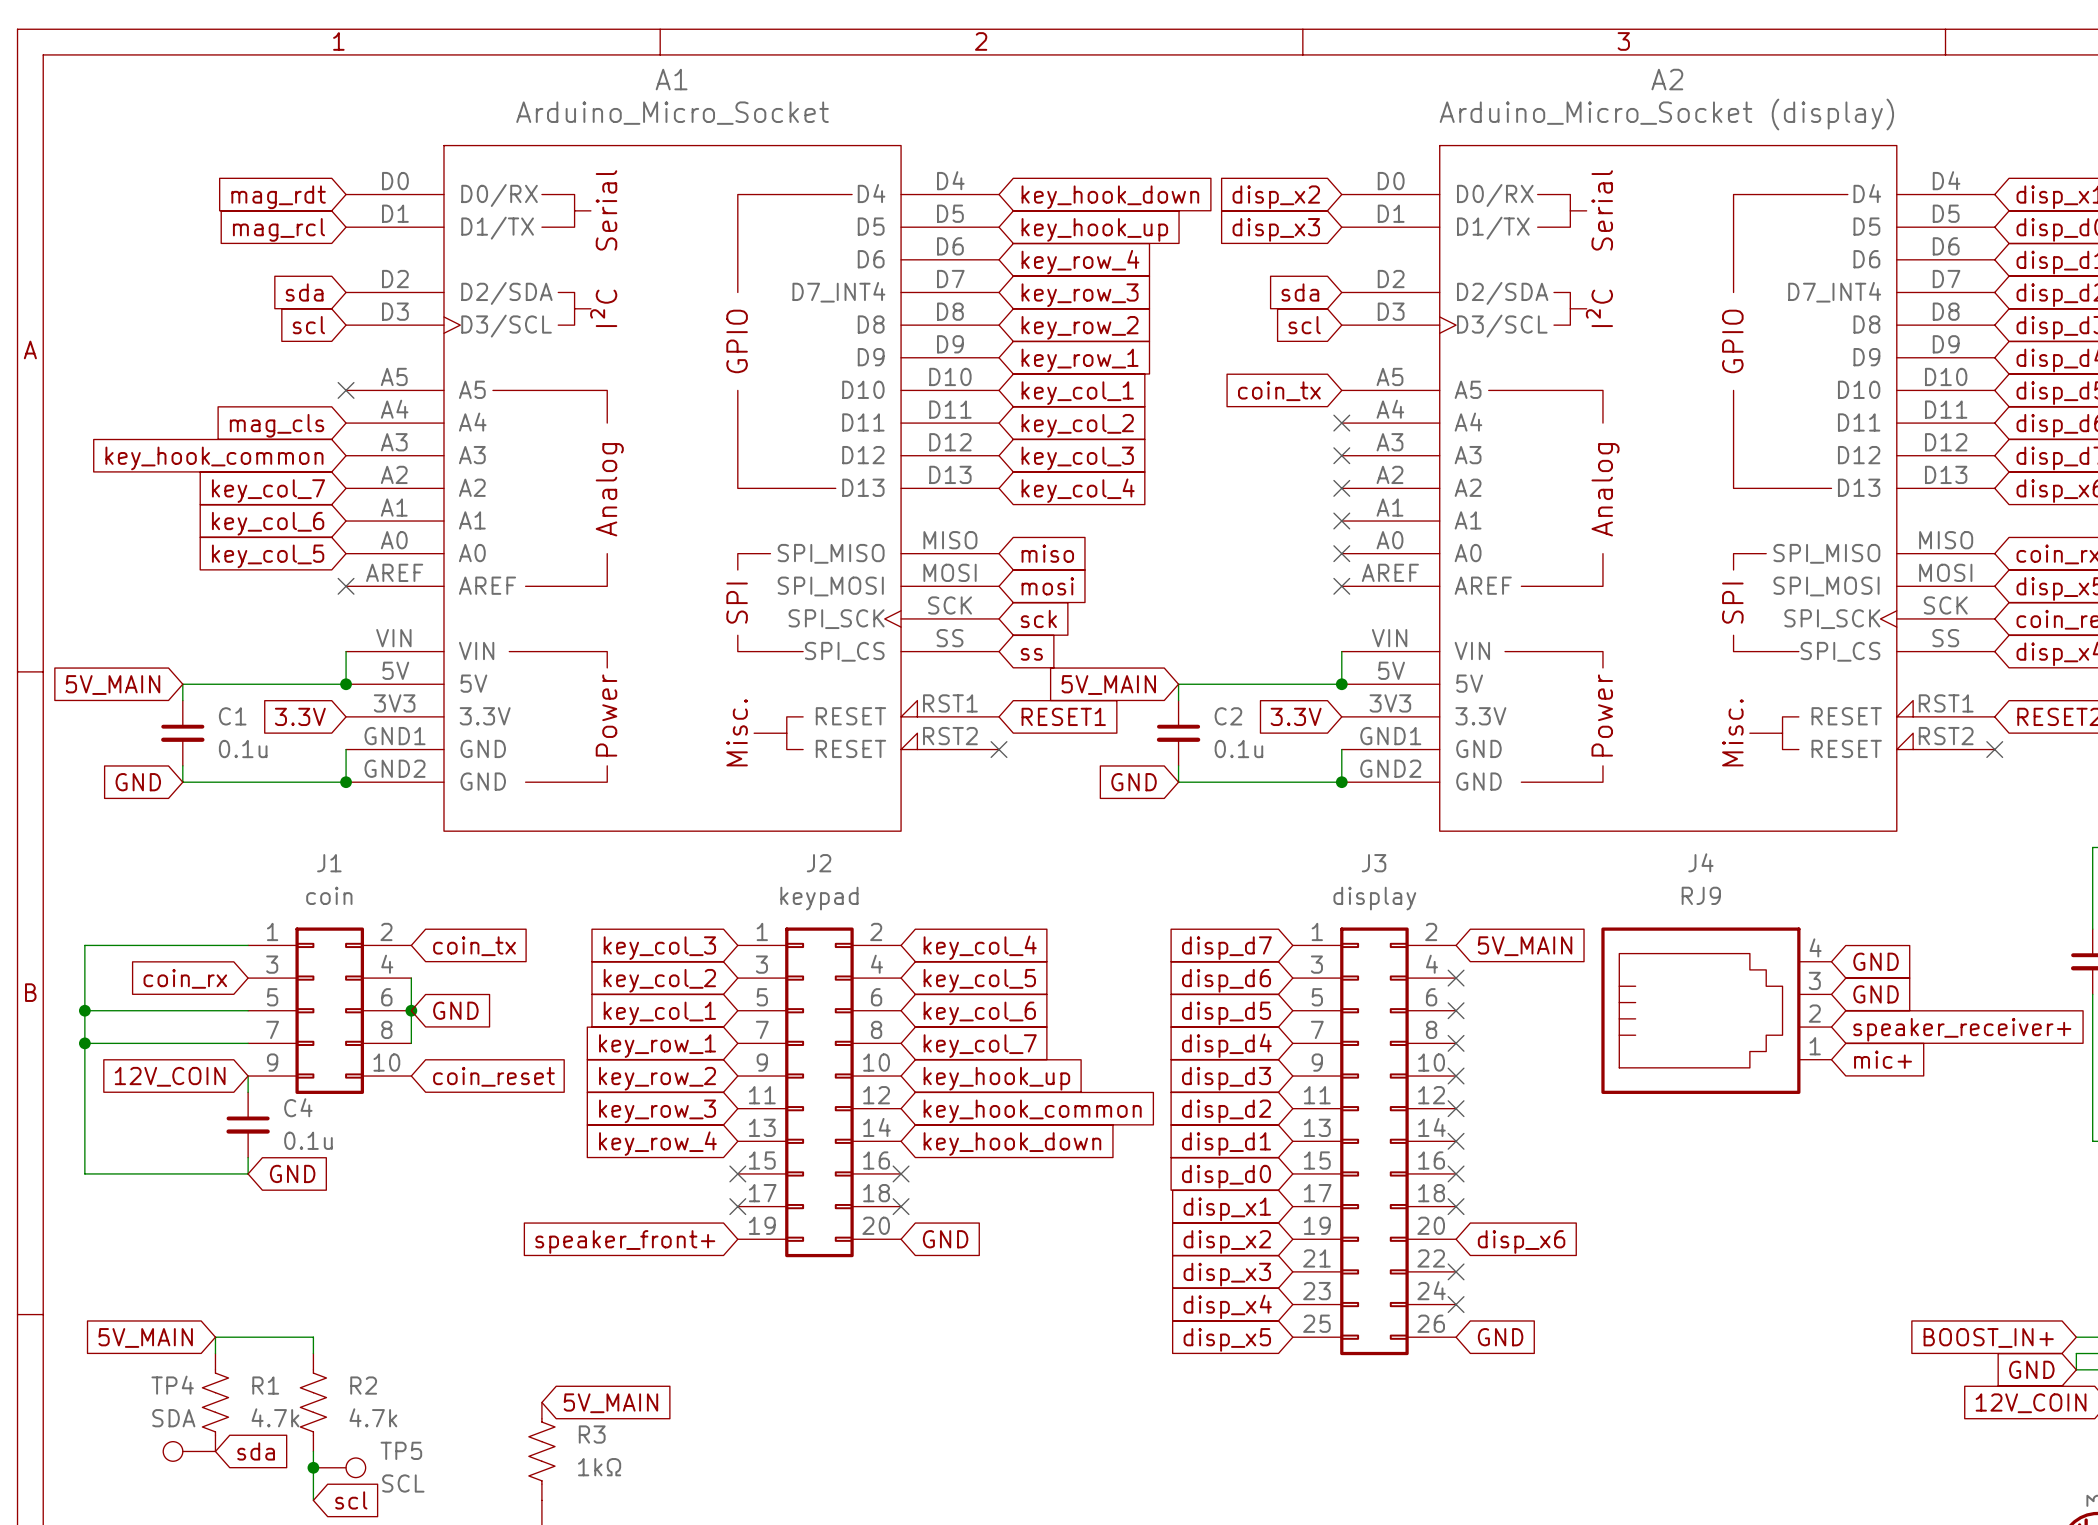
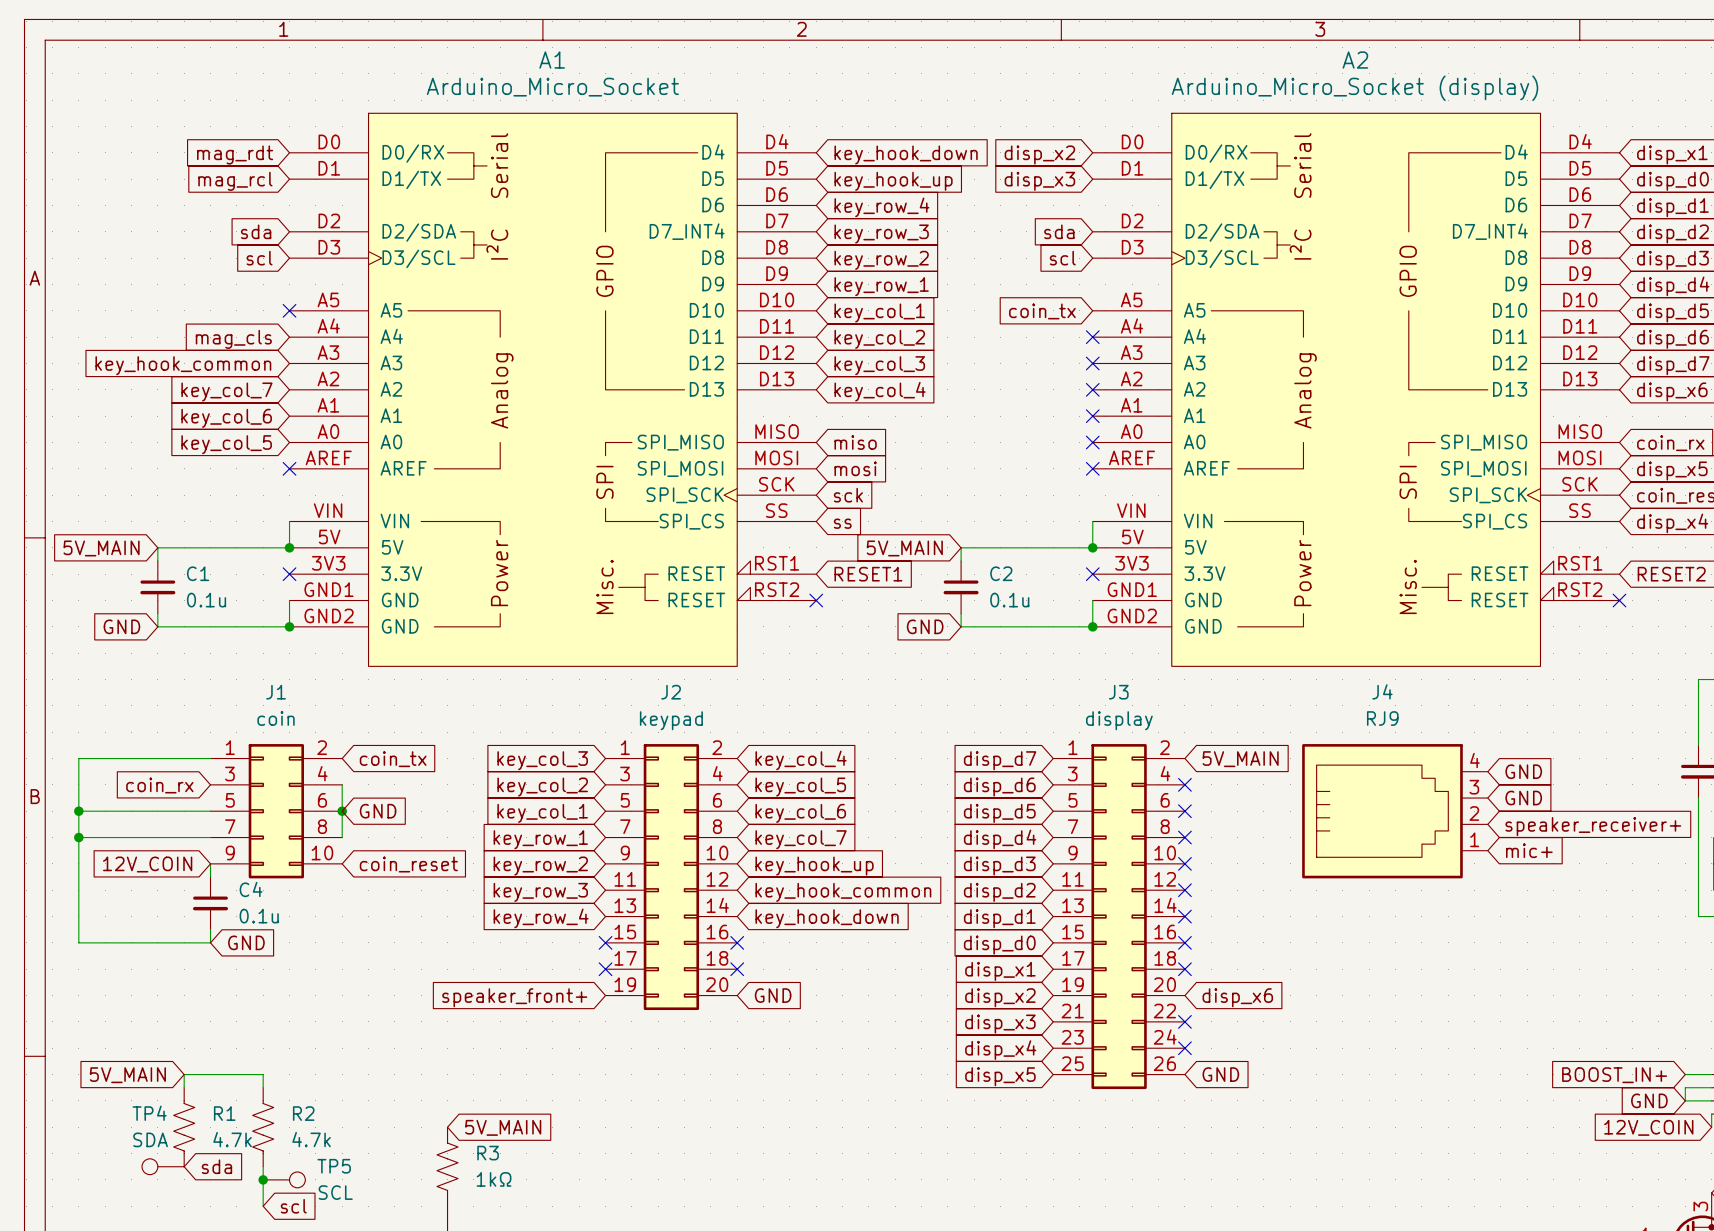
global label: 3.3V (300, 716) -> none
no-connect mark: none -> (289, 574)
global label: 3.3V (1296, 716) -> none
no-connect mark: none -> (1092, 574)

